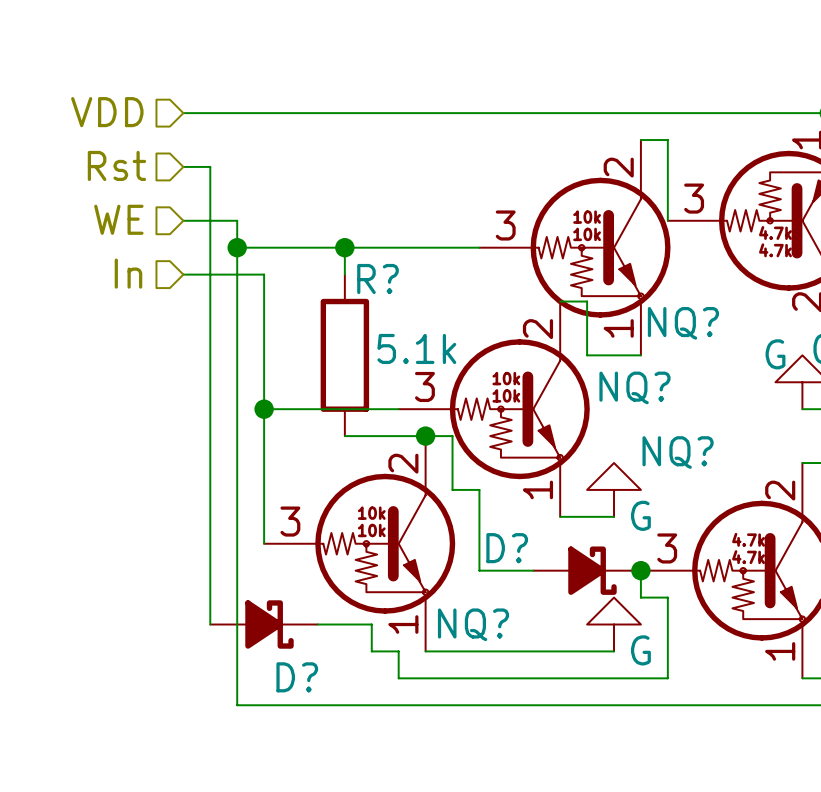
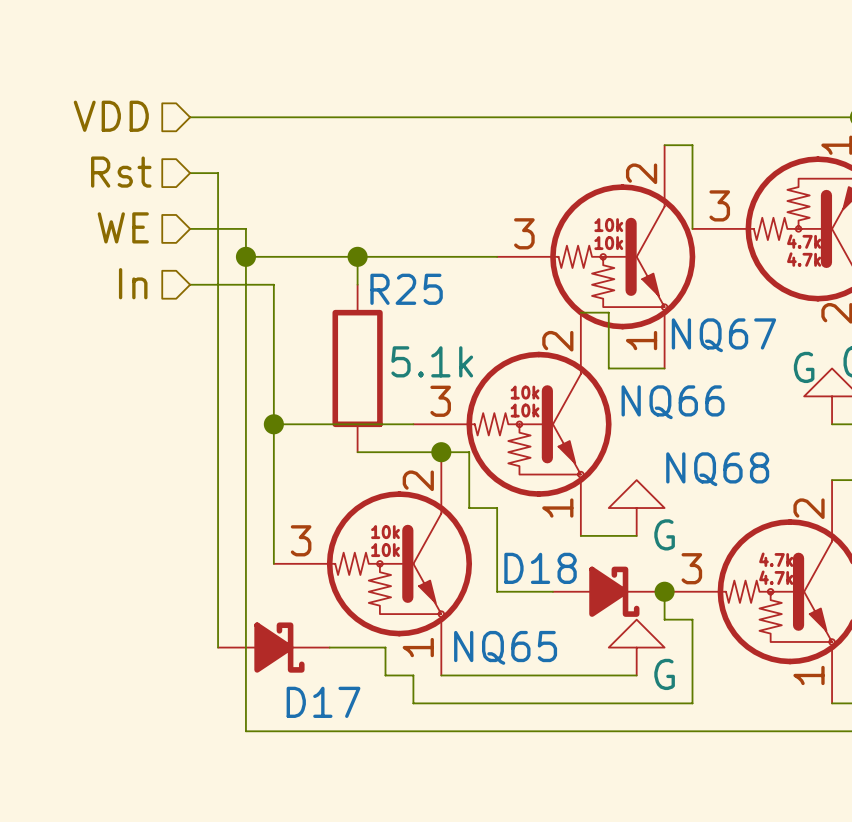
R? name: R? (378, 278) -> R25 (406, 289)
NQ? name: NQ? (683, 323) -> NQ67 (723, 335)
NQ? name: NQ? (634, 387) -> NQ66 (673, 402)
NQ? name: NQ? (678, 452) -> NQ68 (717, 469)
D? name: D? (507, 548) -> D18 (540, 568)
NQ? name: NQ? (473, 624) -> NQ65 (505, 647)
D? name: D? (297, 677) -> D17 (323, 702)

